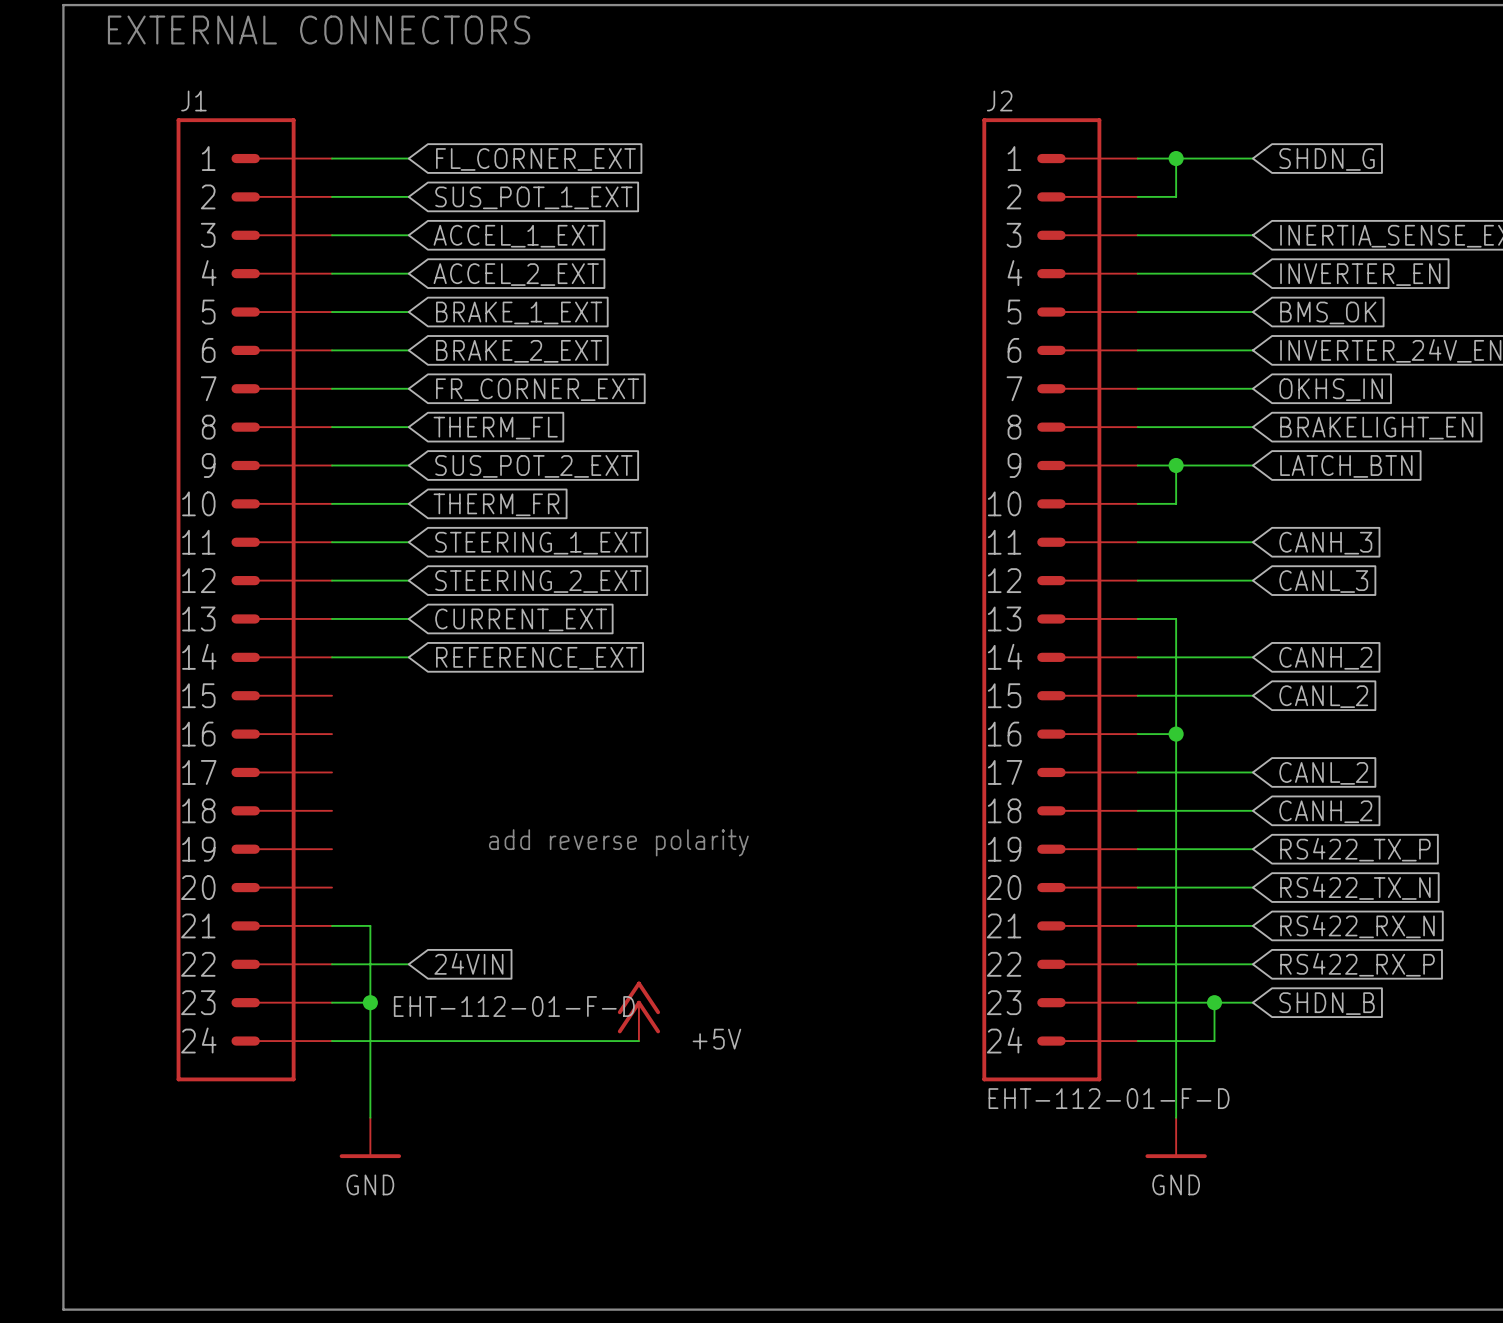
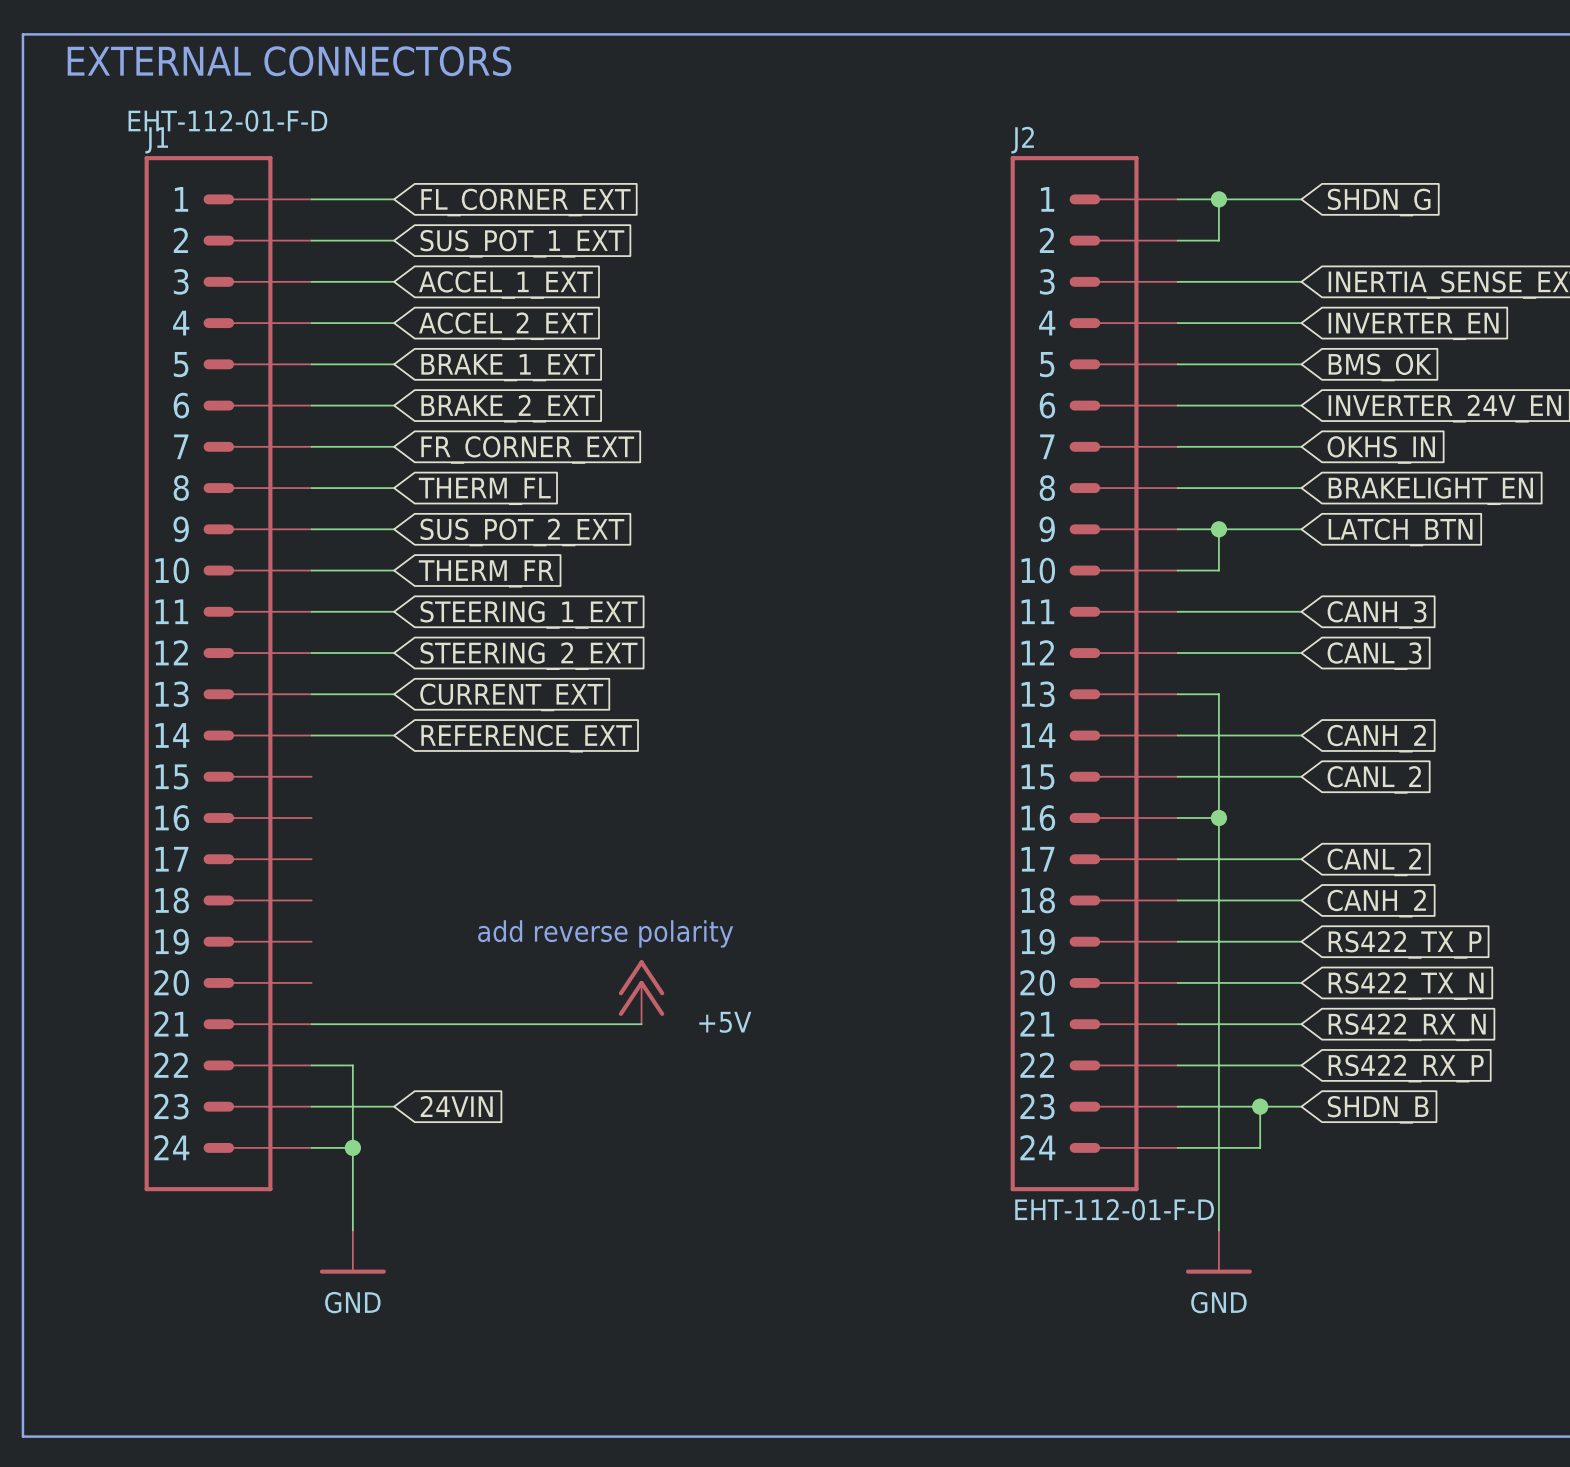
wire: (370, 925) (370, 964) (408, 964) -> (352, 1024) (641, 1024)
global label position: 24VIN (468, 963) -> 24VIN (456, 1106)
wire: none -> (352, 1106) (394, 1106)
junction position: (370, 1002) -> (352, 1147)
J1 text position: EHT-112-01-F-D (514, 1006) -> EHT-112-01-F-D (227, 121)
power symbol position: +5V (638, 1011) -> +5V (641, 992)
wire: (370, 1041) (638, 1041) -> none

